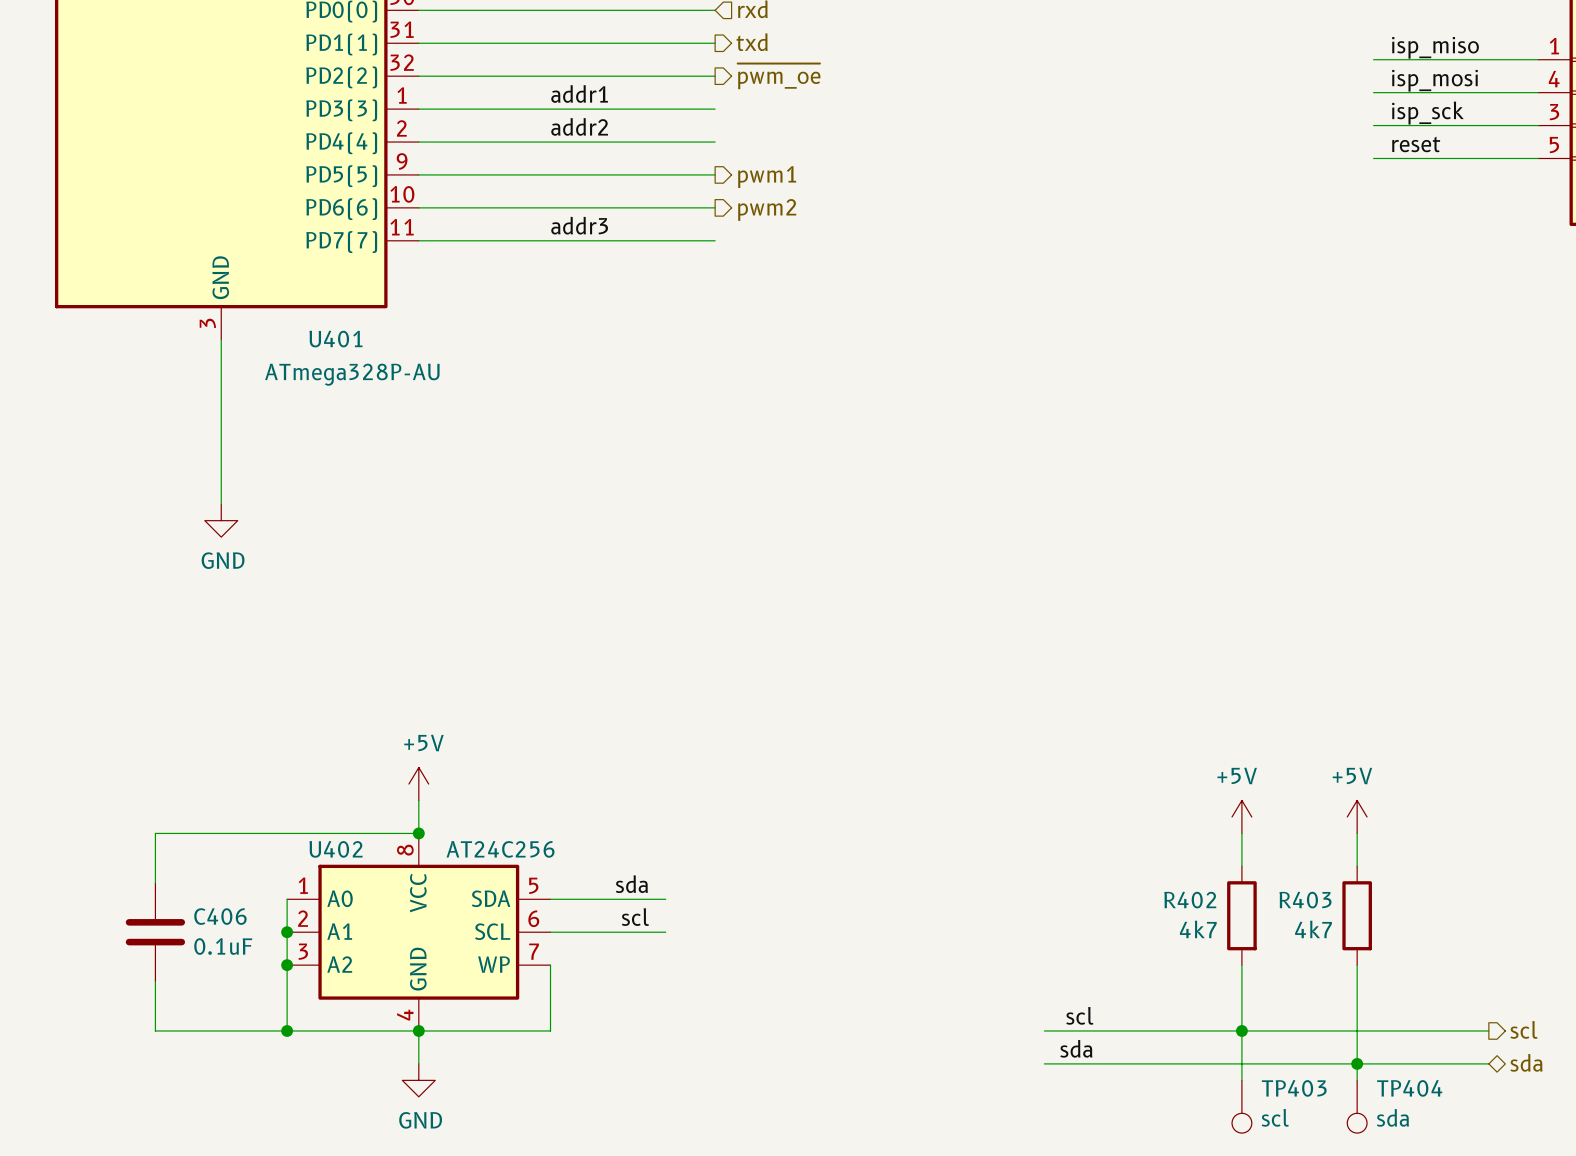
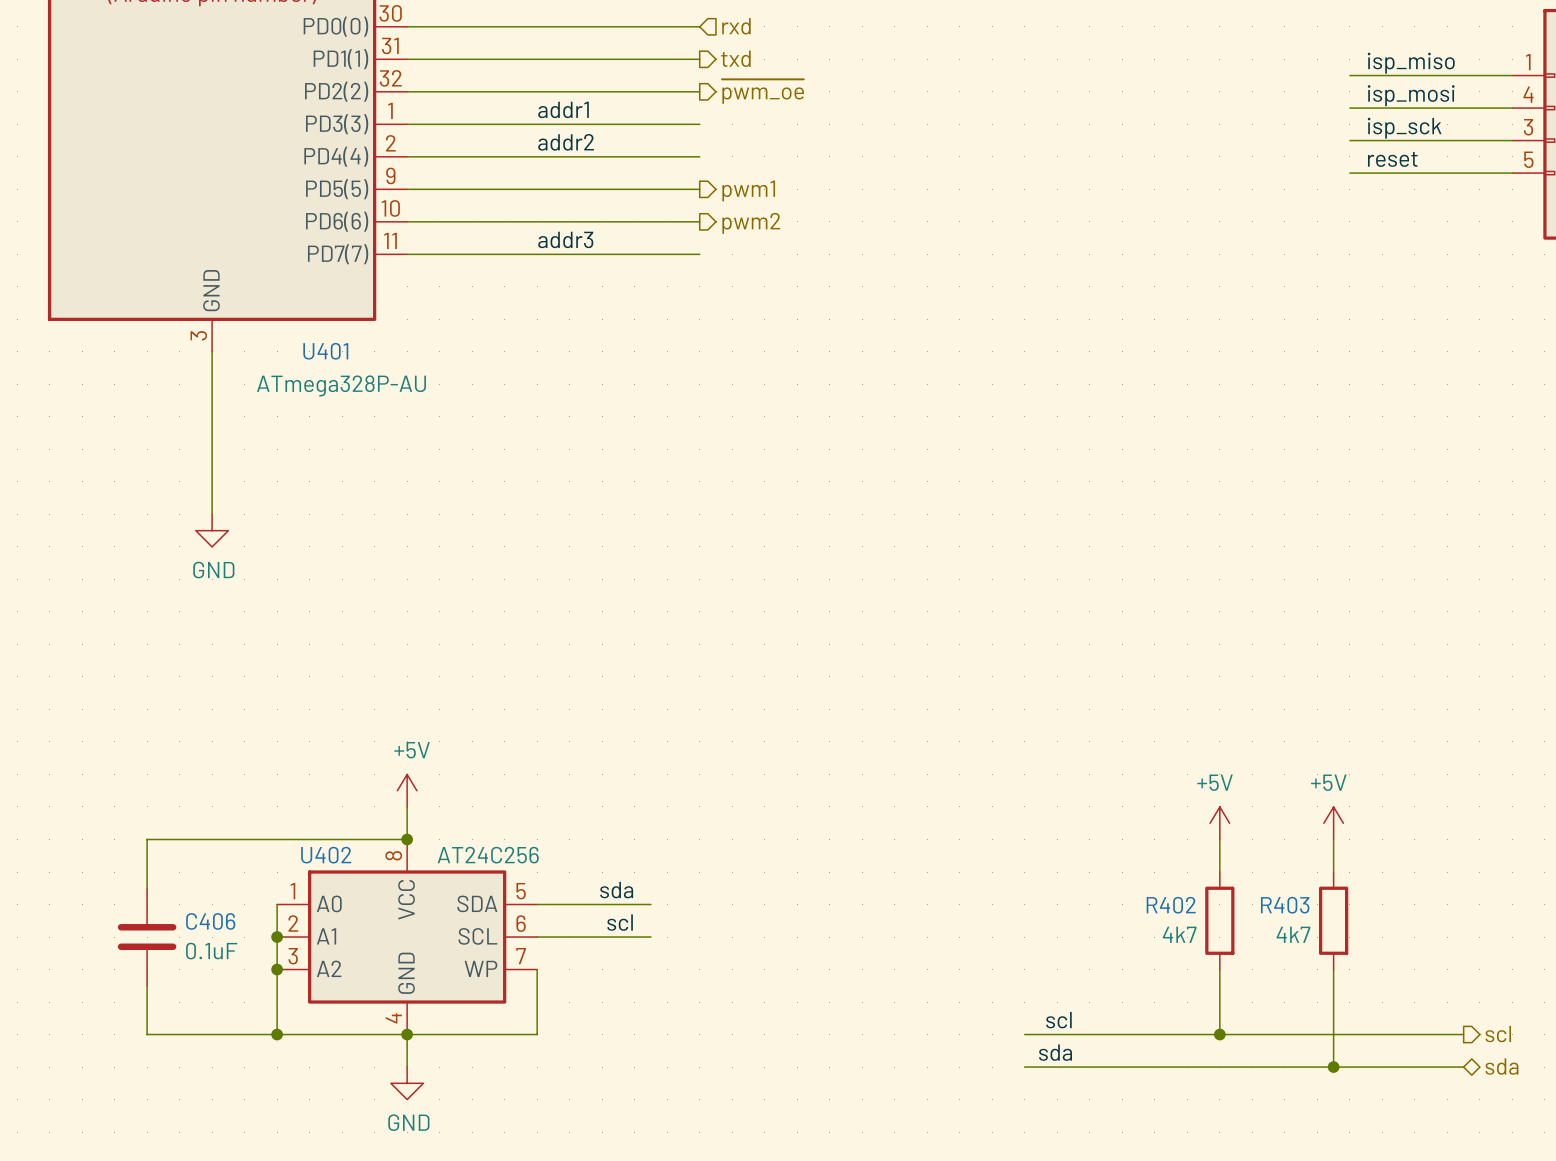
wire: (1241, 1030) (1241, 1080) -> none
wire: (1357, 1063) (1357, 1080) -> none
TP403: scl (1241, 1106) -> none
TP404: sda (1357, 1106) -> none

